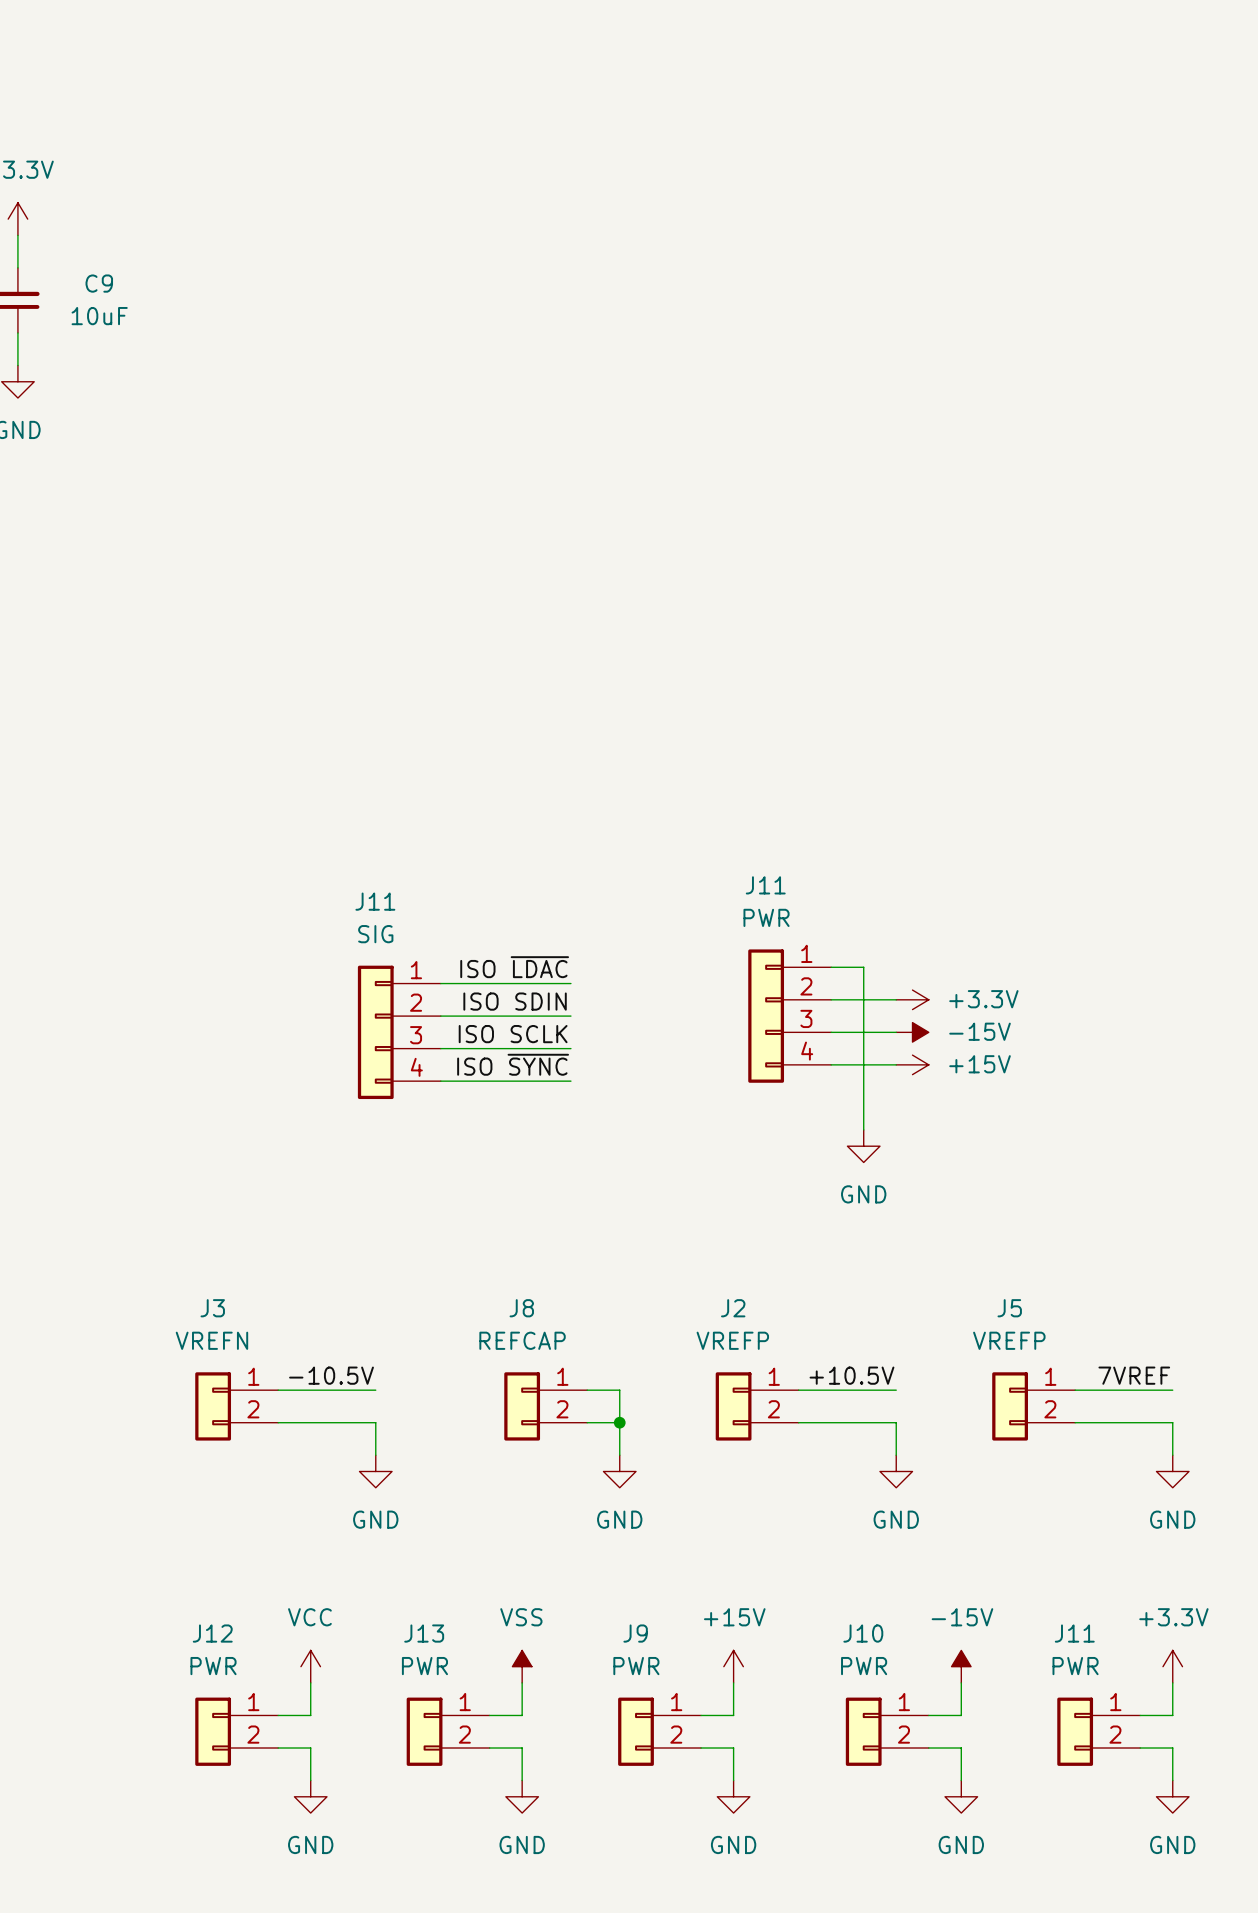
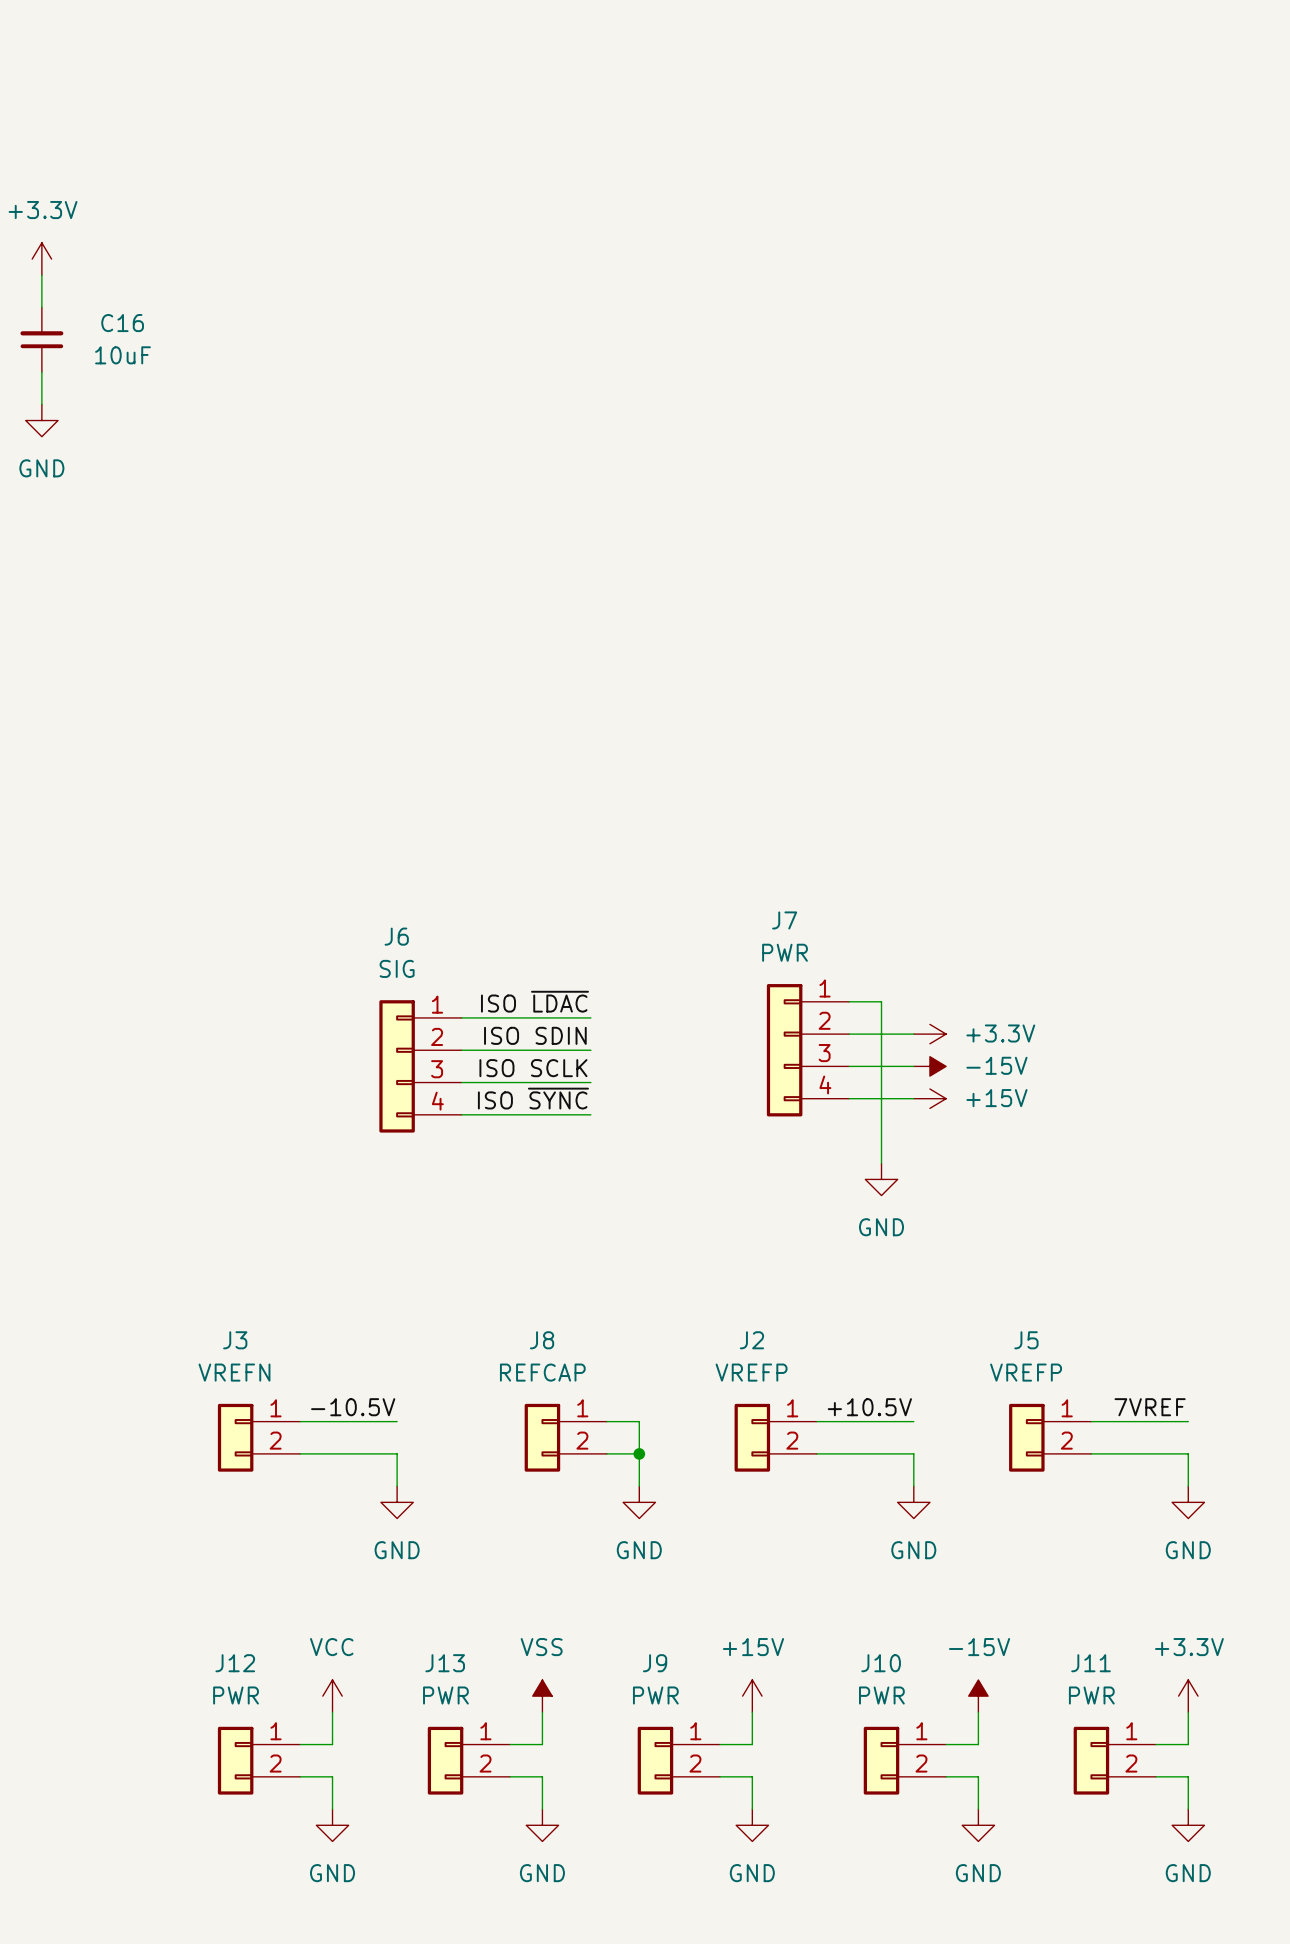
C9 name: C9 (99, 283) -> C16 (122, 323)
J11 name: J11 (765, 885) -> J7 (784, 920)
J11 name: J11 (375, 901) -> J6 (396, 936)

